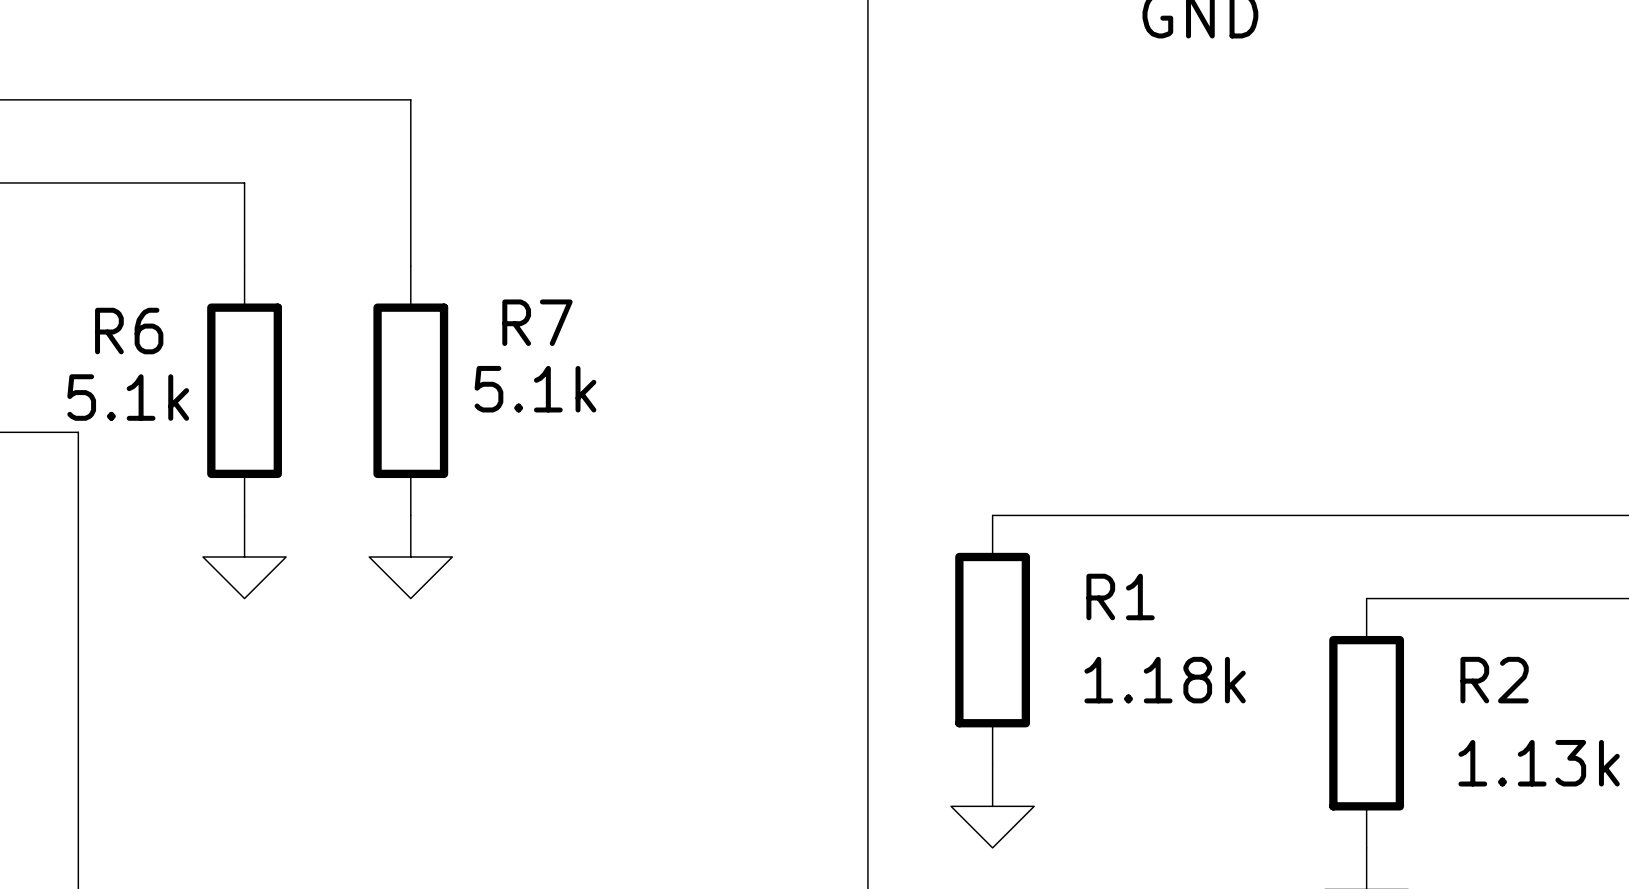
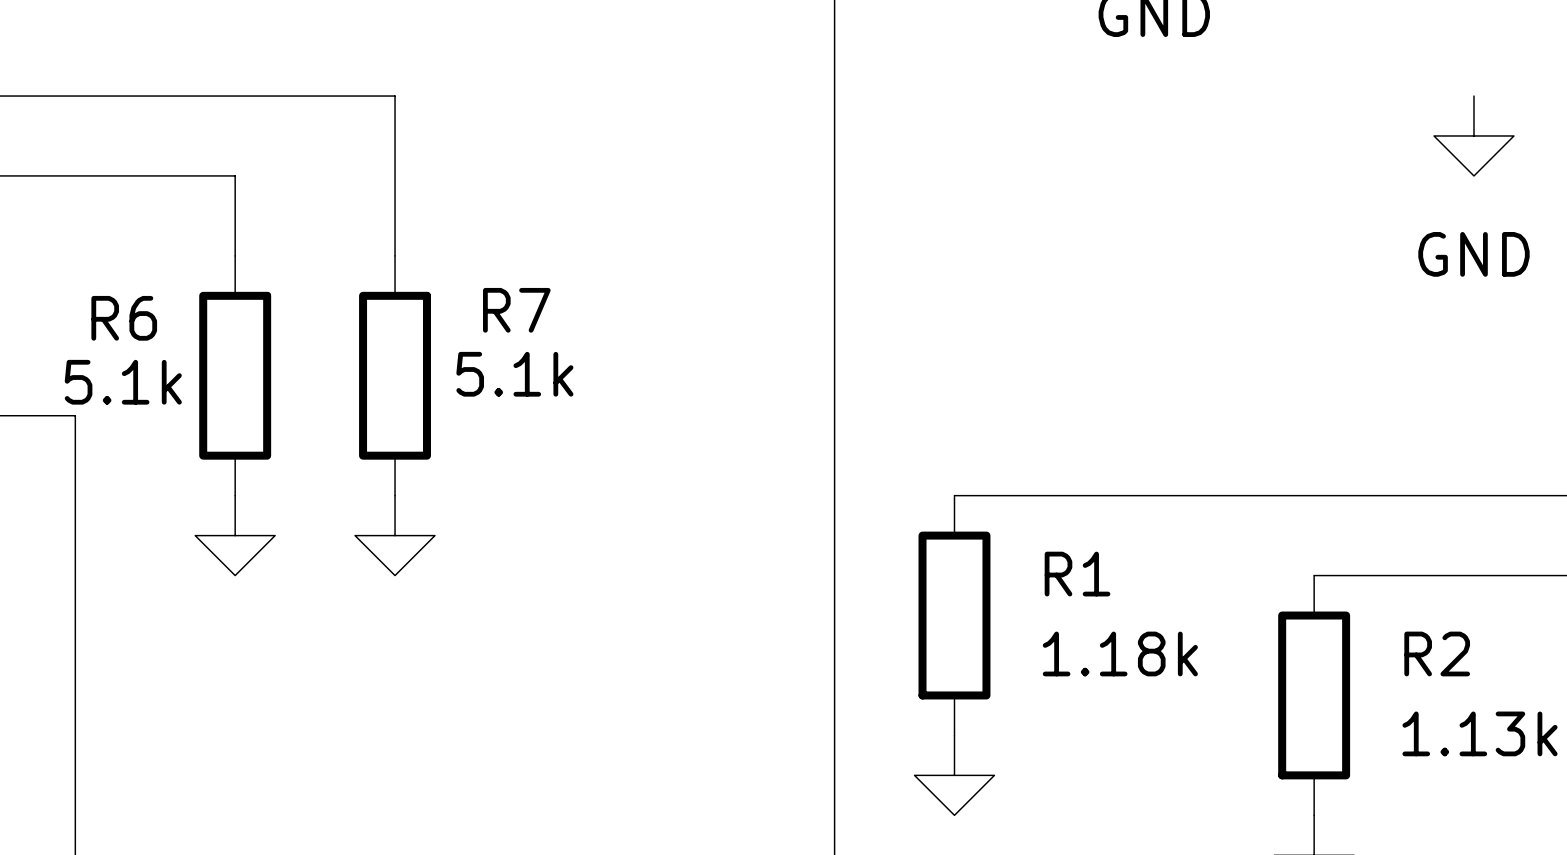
power symbol: none -> GND (1473, 135)

